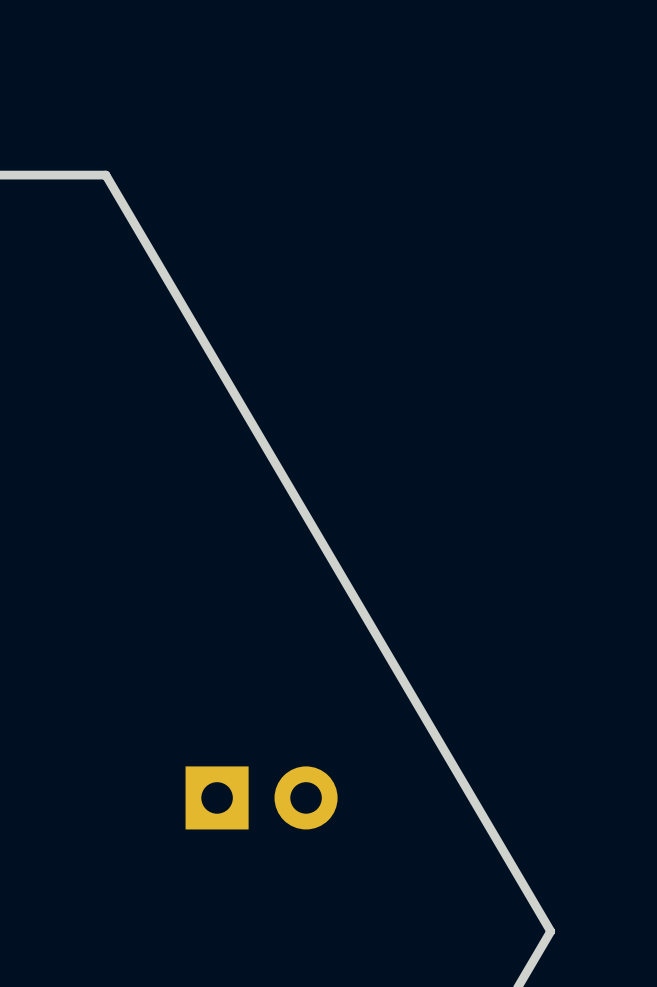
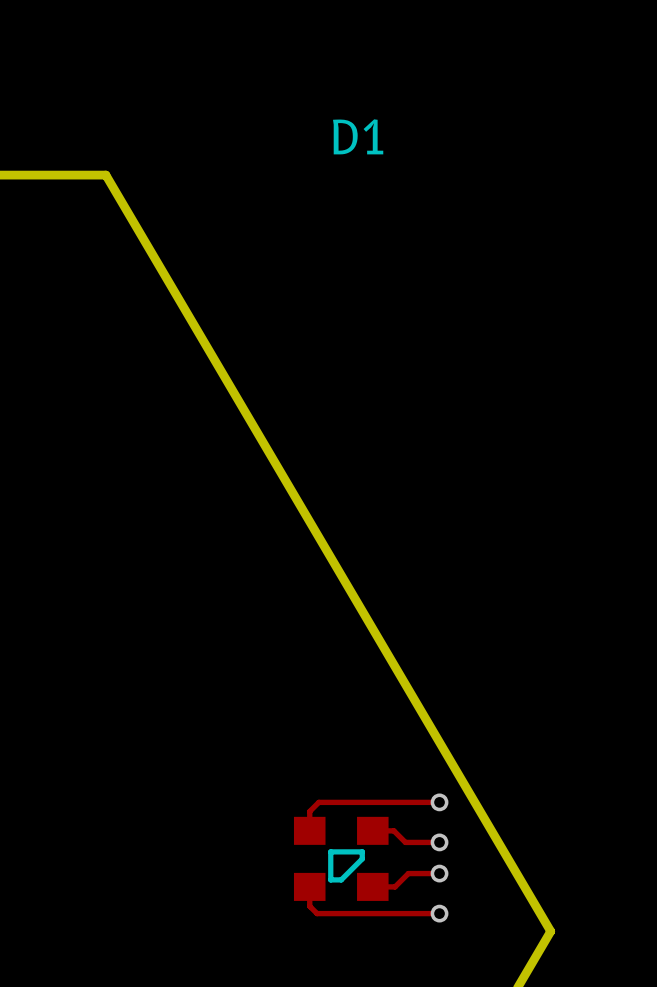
part: (261, 797) -> none
track: none -> (439, 802) (318, 802) (309, 811) (309, 830)
via: none -> (439, 802)
track: none -> (372, 830) (393, 830) (405, 842) (439, 842)
via: none -> (439, 842)
D1: none -> (341, 858)
track: none -> (439, 873) (408, 873) (395, 886) (372, 886)
via: none -> (439, 873)
track: none -> (309, 886) (309, 906) (317, 913) (439, 913)
via: none -> (439, 913)

